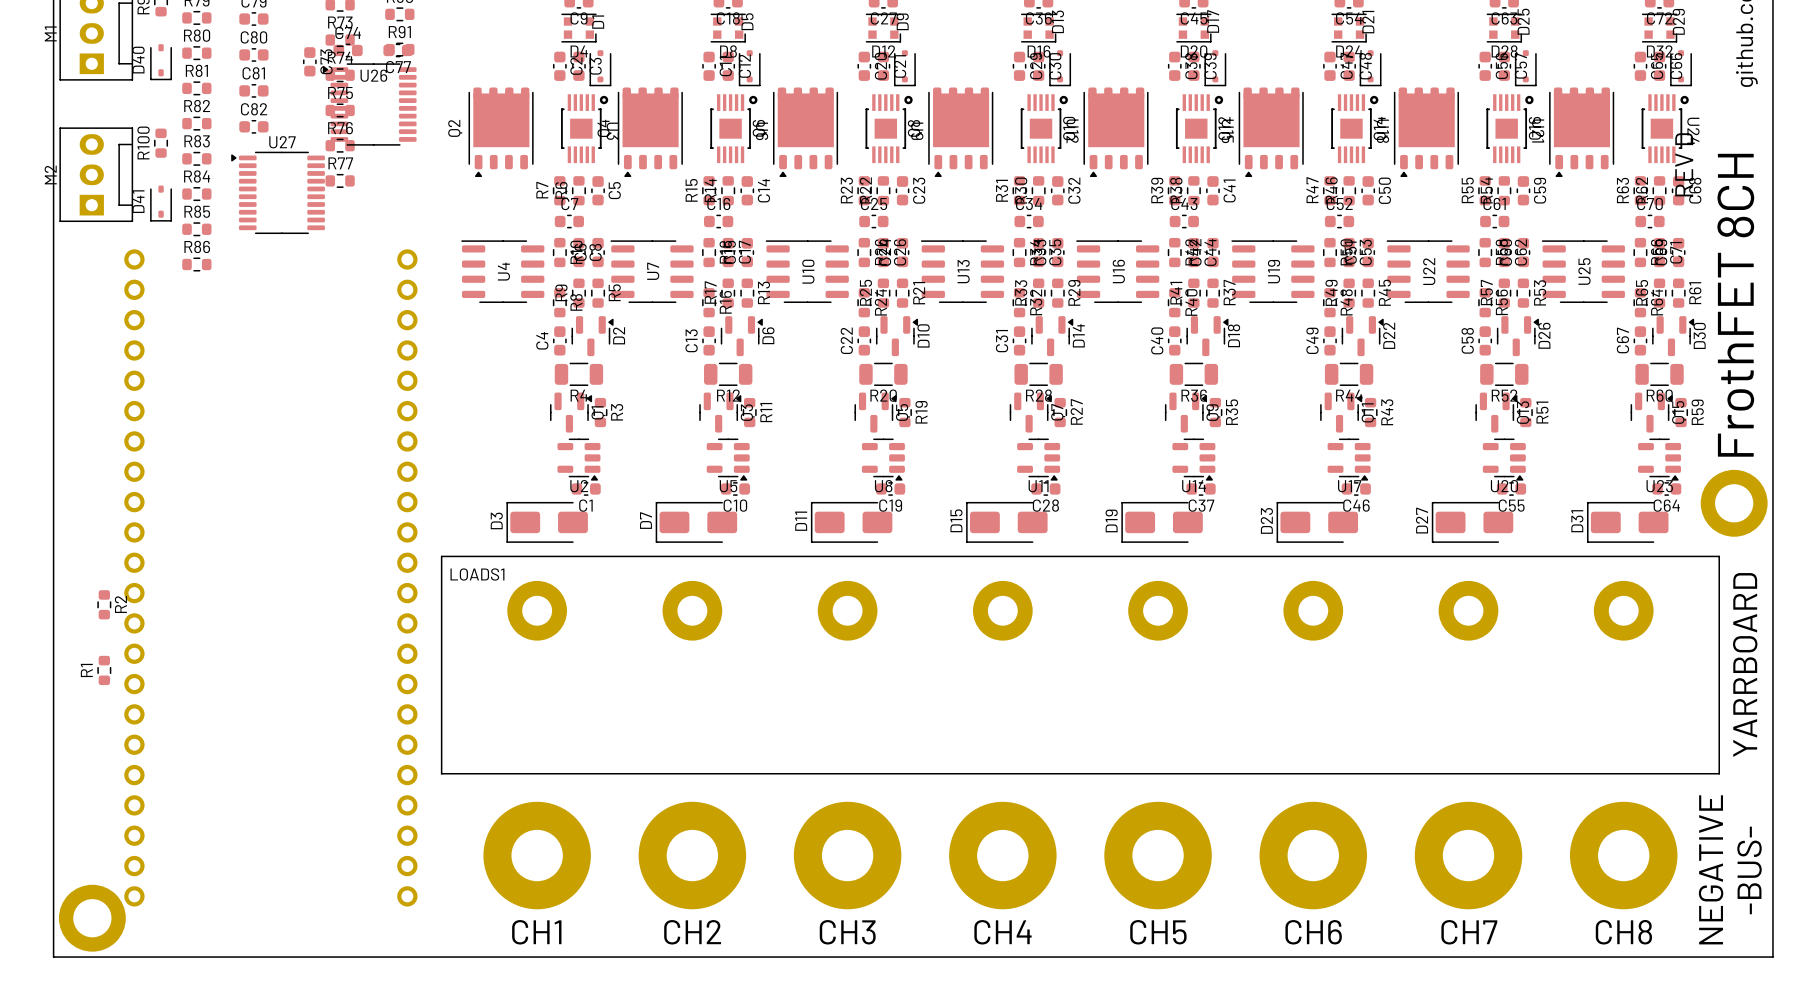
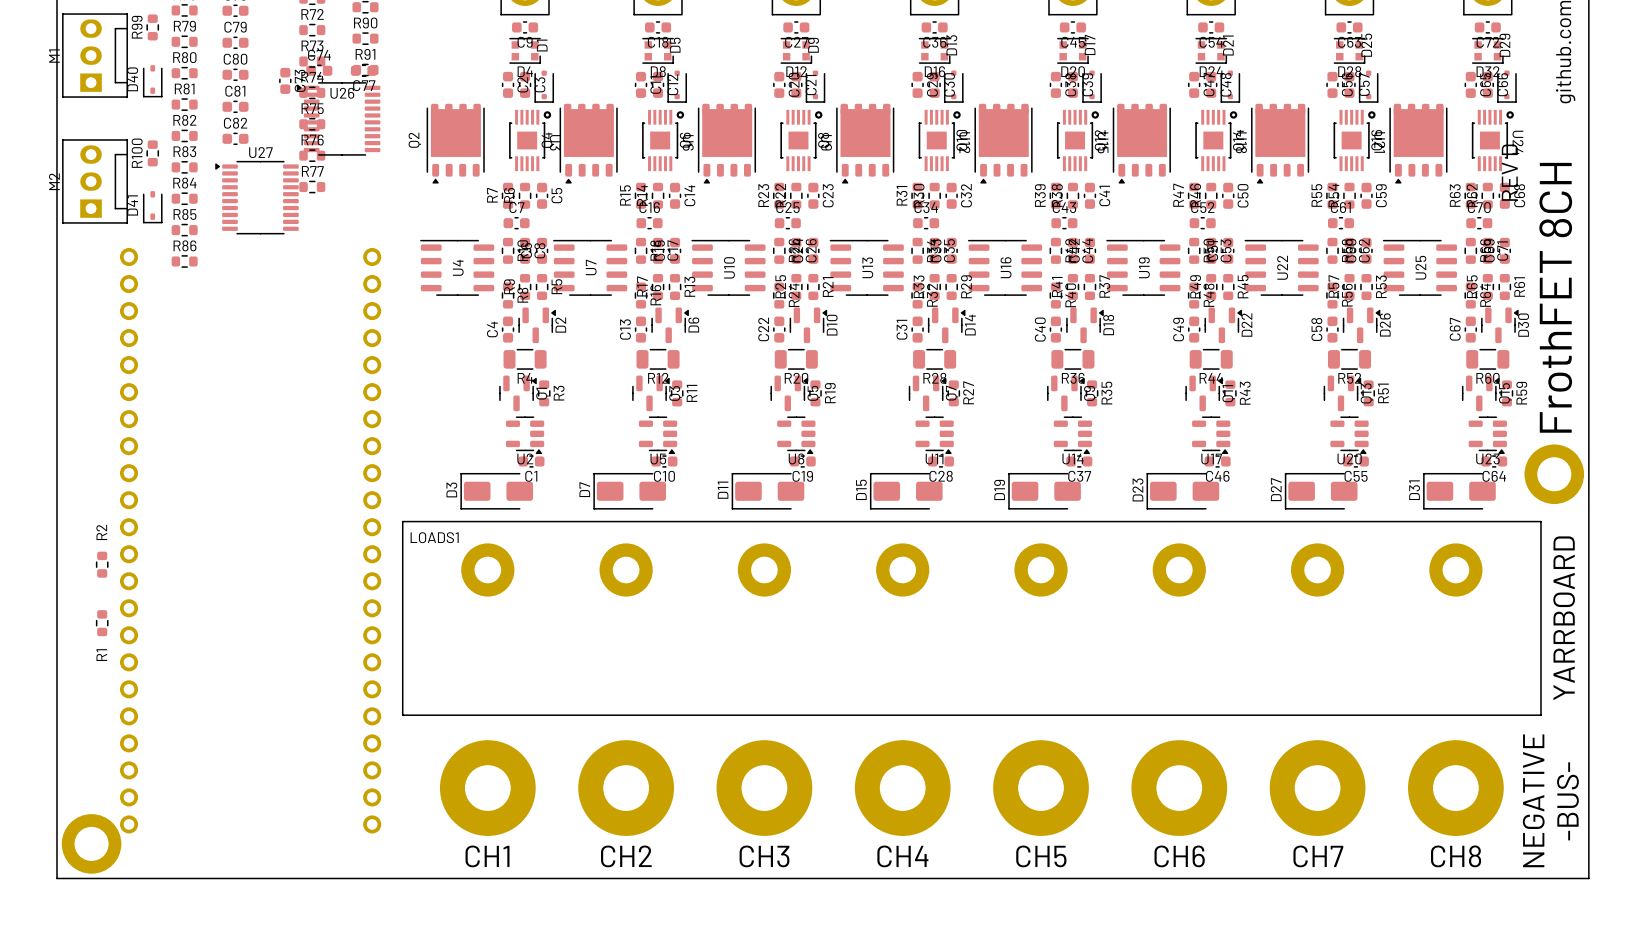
R2 name position: R2 (120, 604) -> R2 (101, 532)
R1 name position: R1 (86, 670) -> R1 (101, 655)

